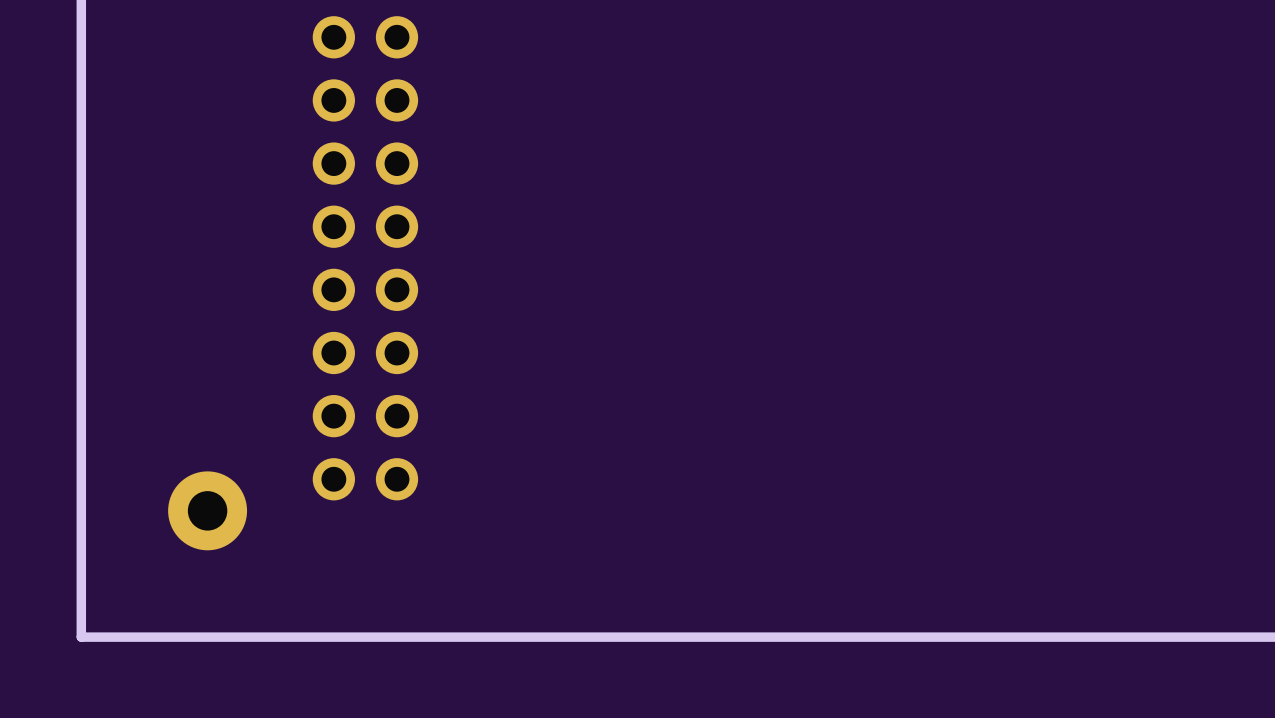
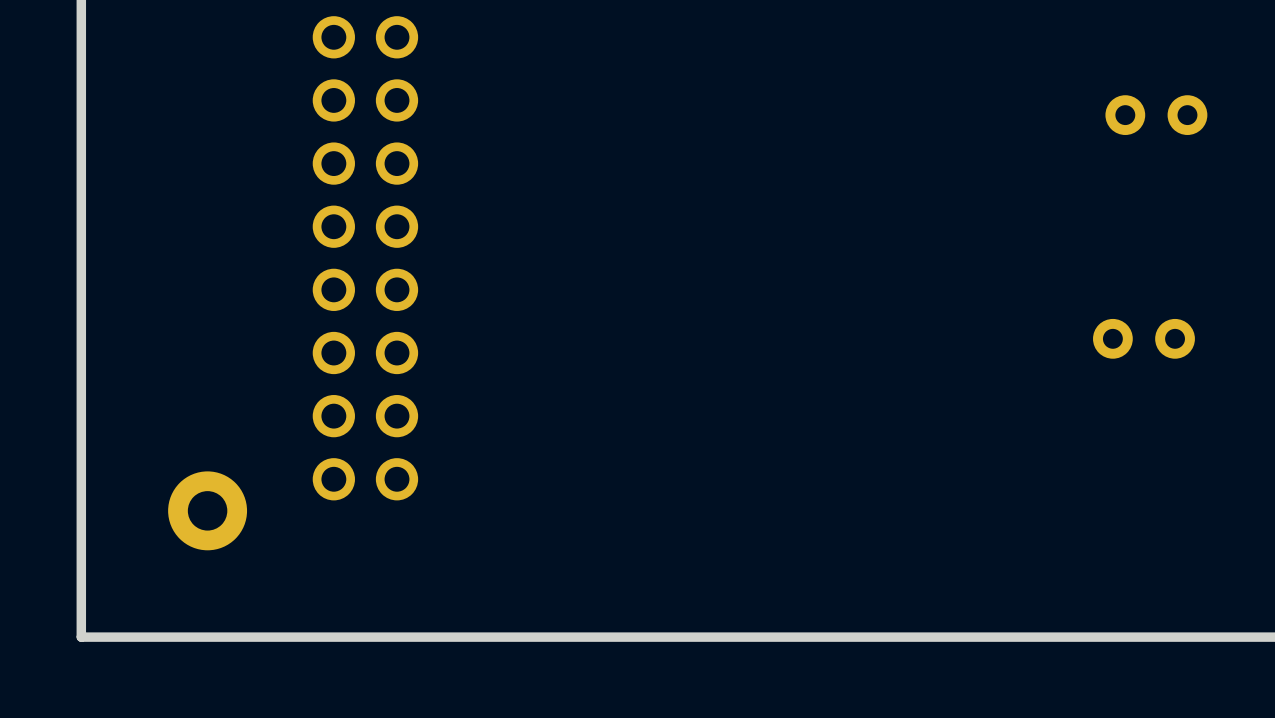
part: none -> (1156, 115)
part: none -> (1143, 338)

